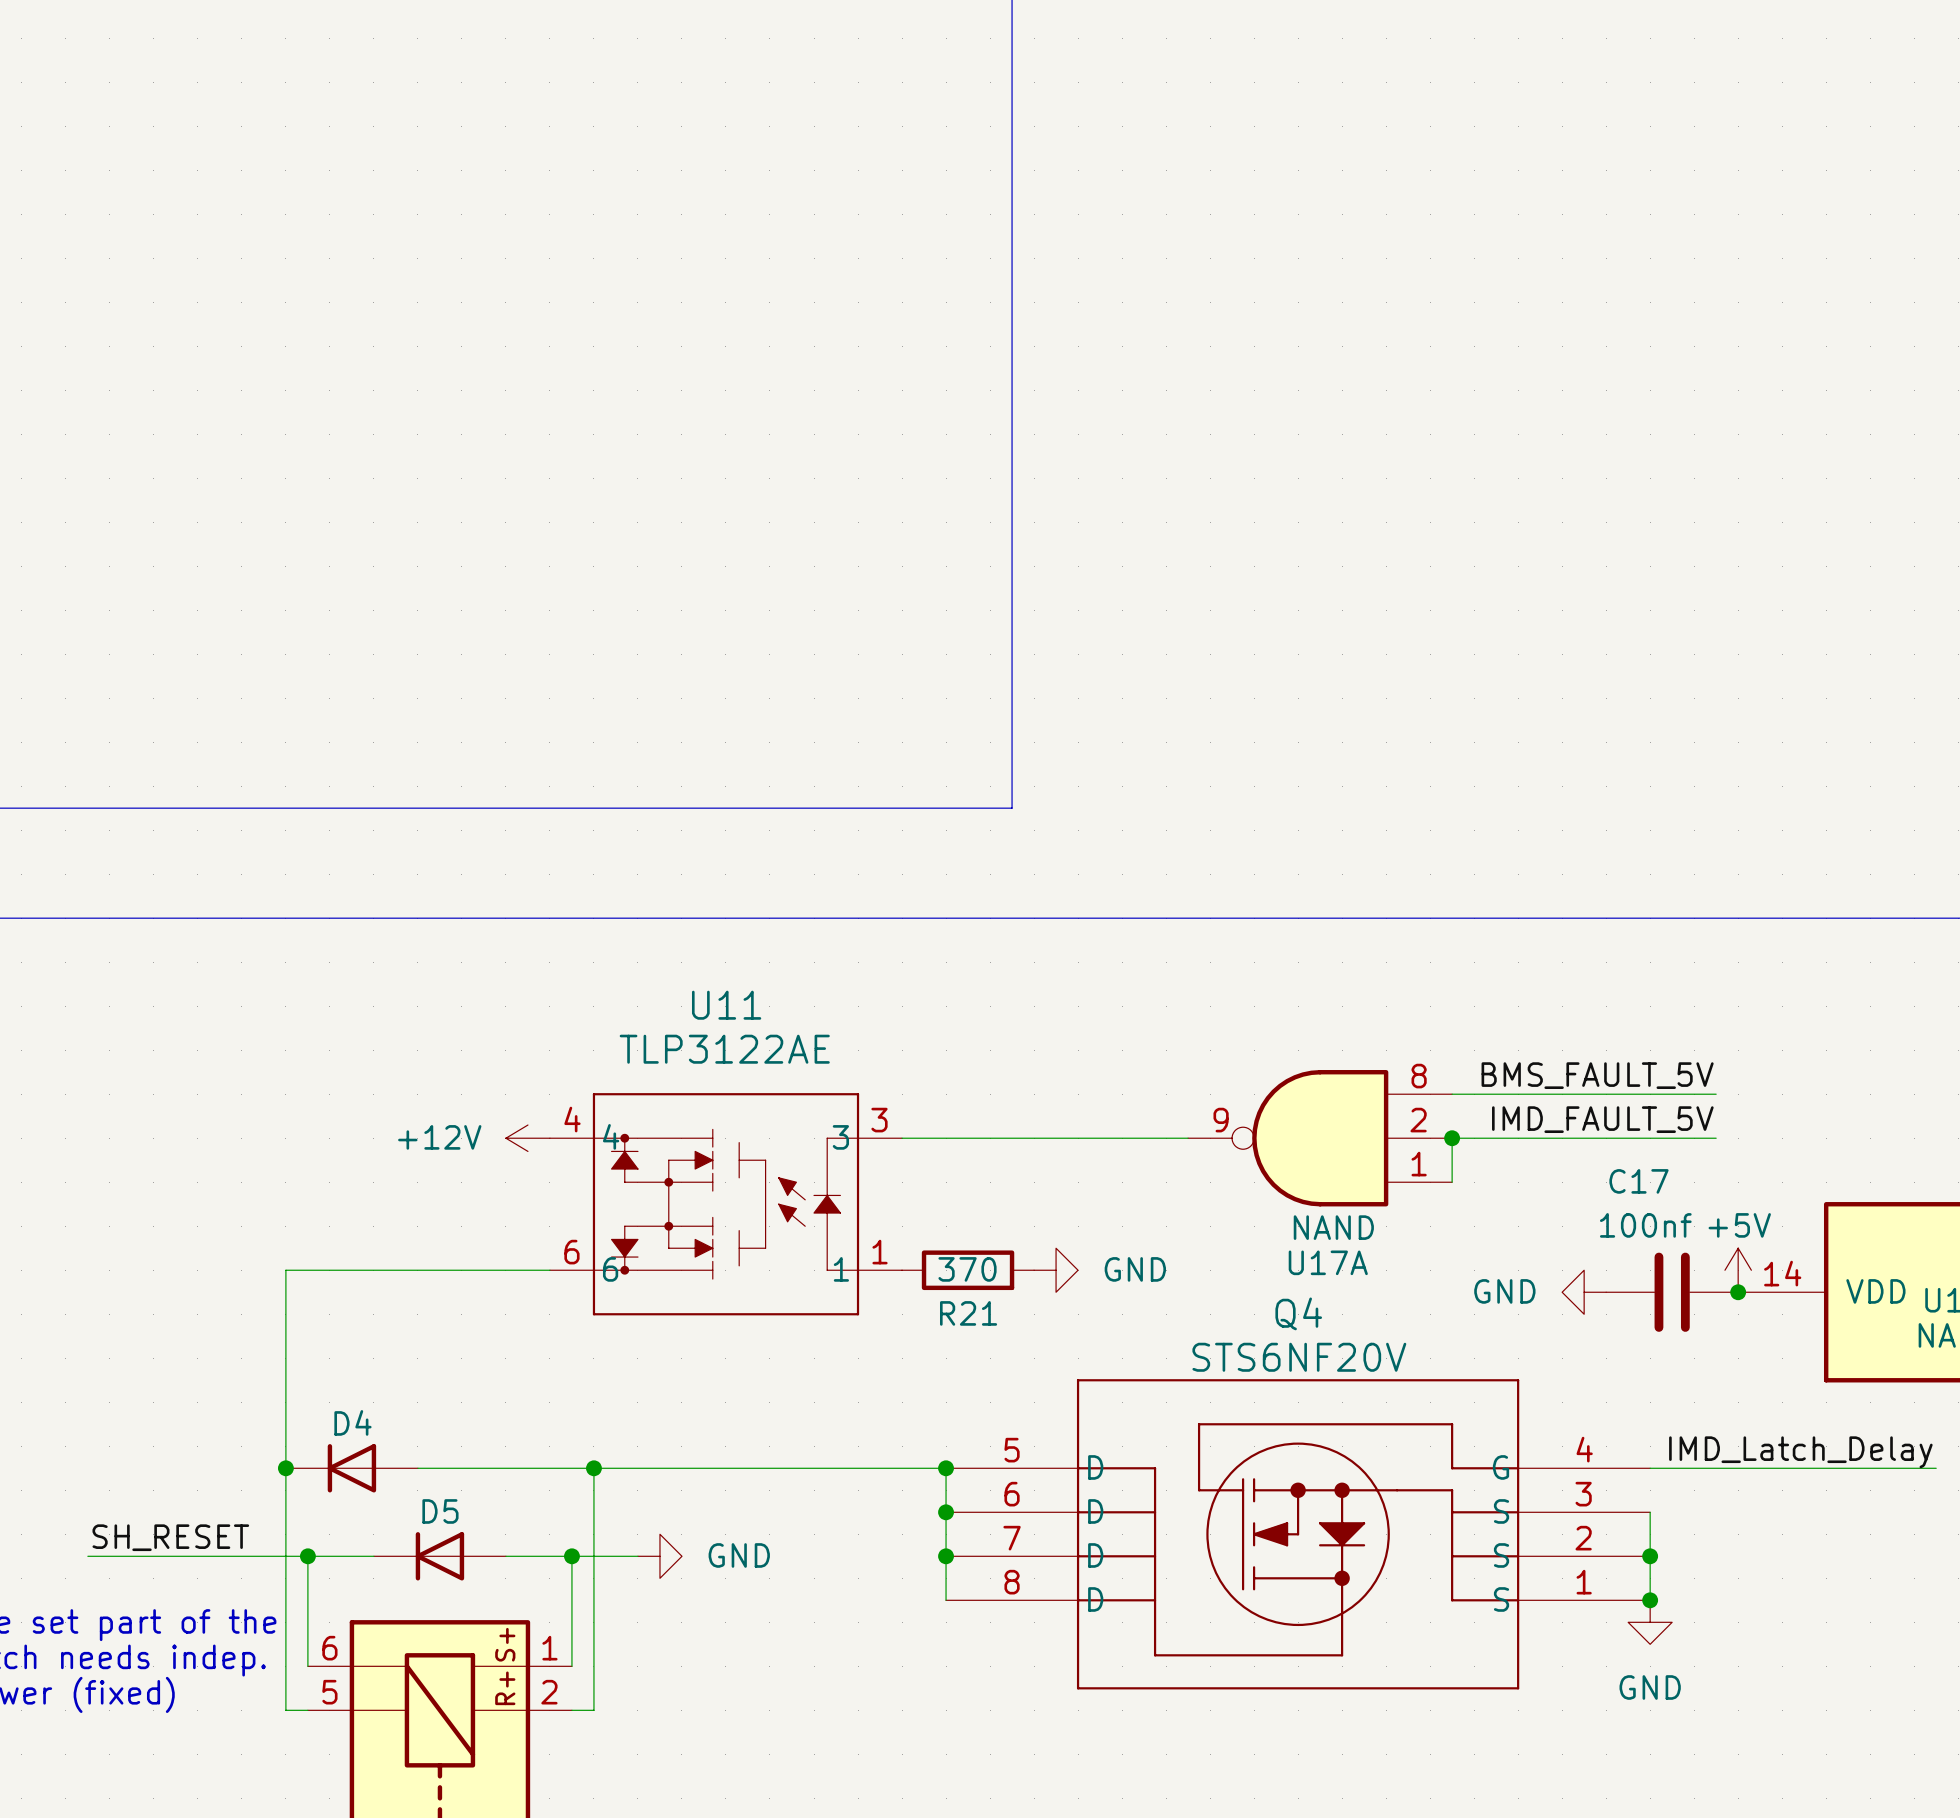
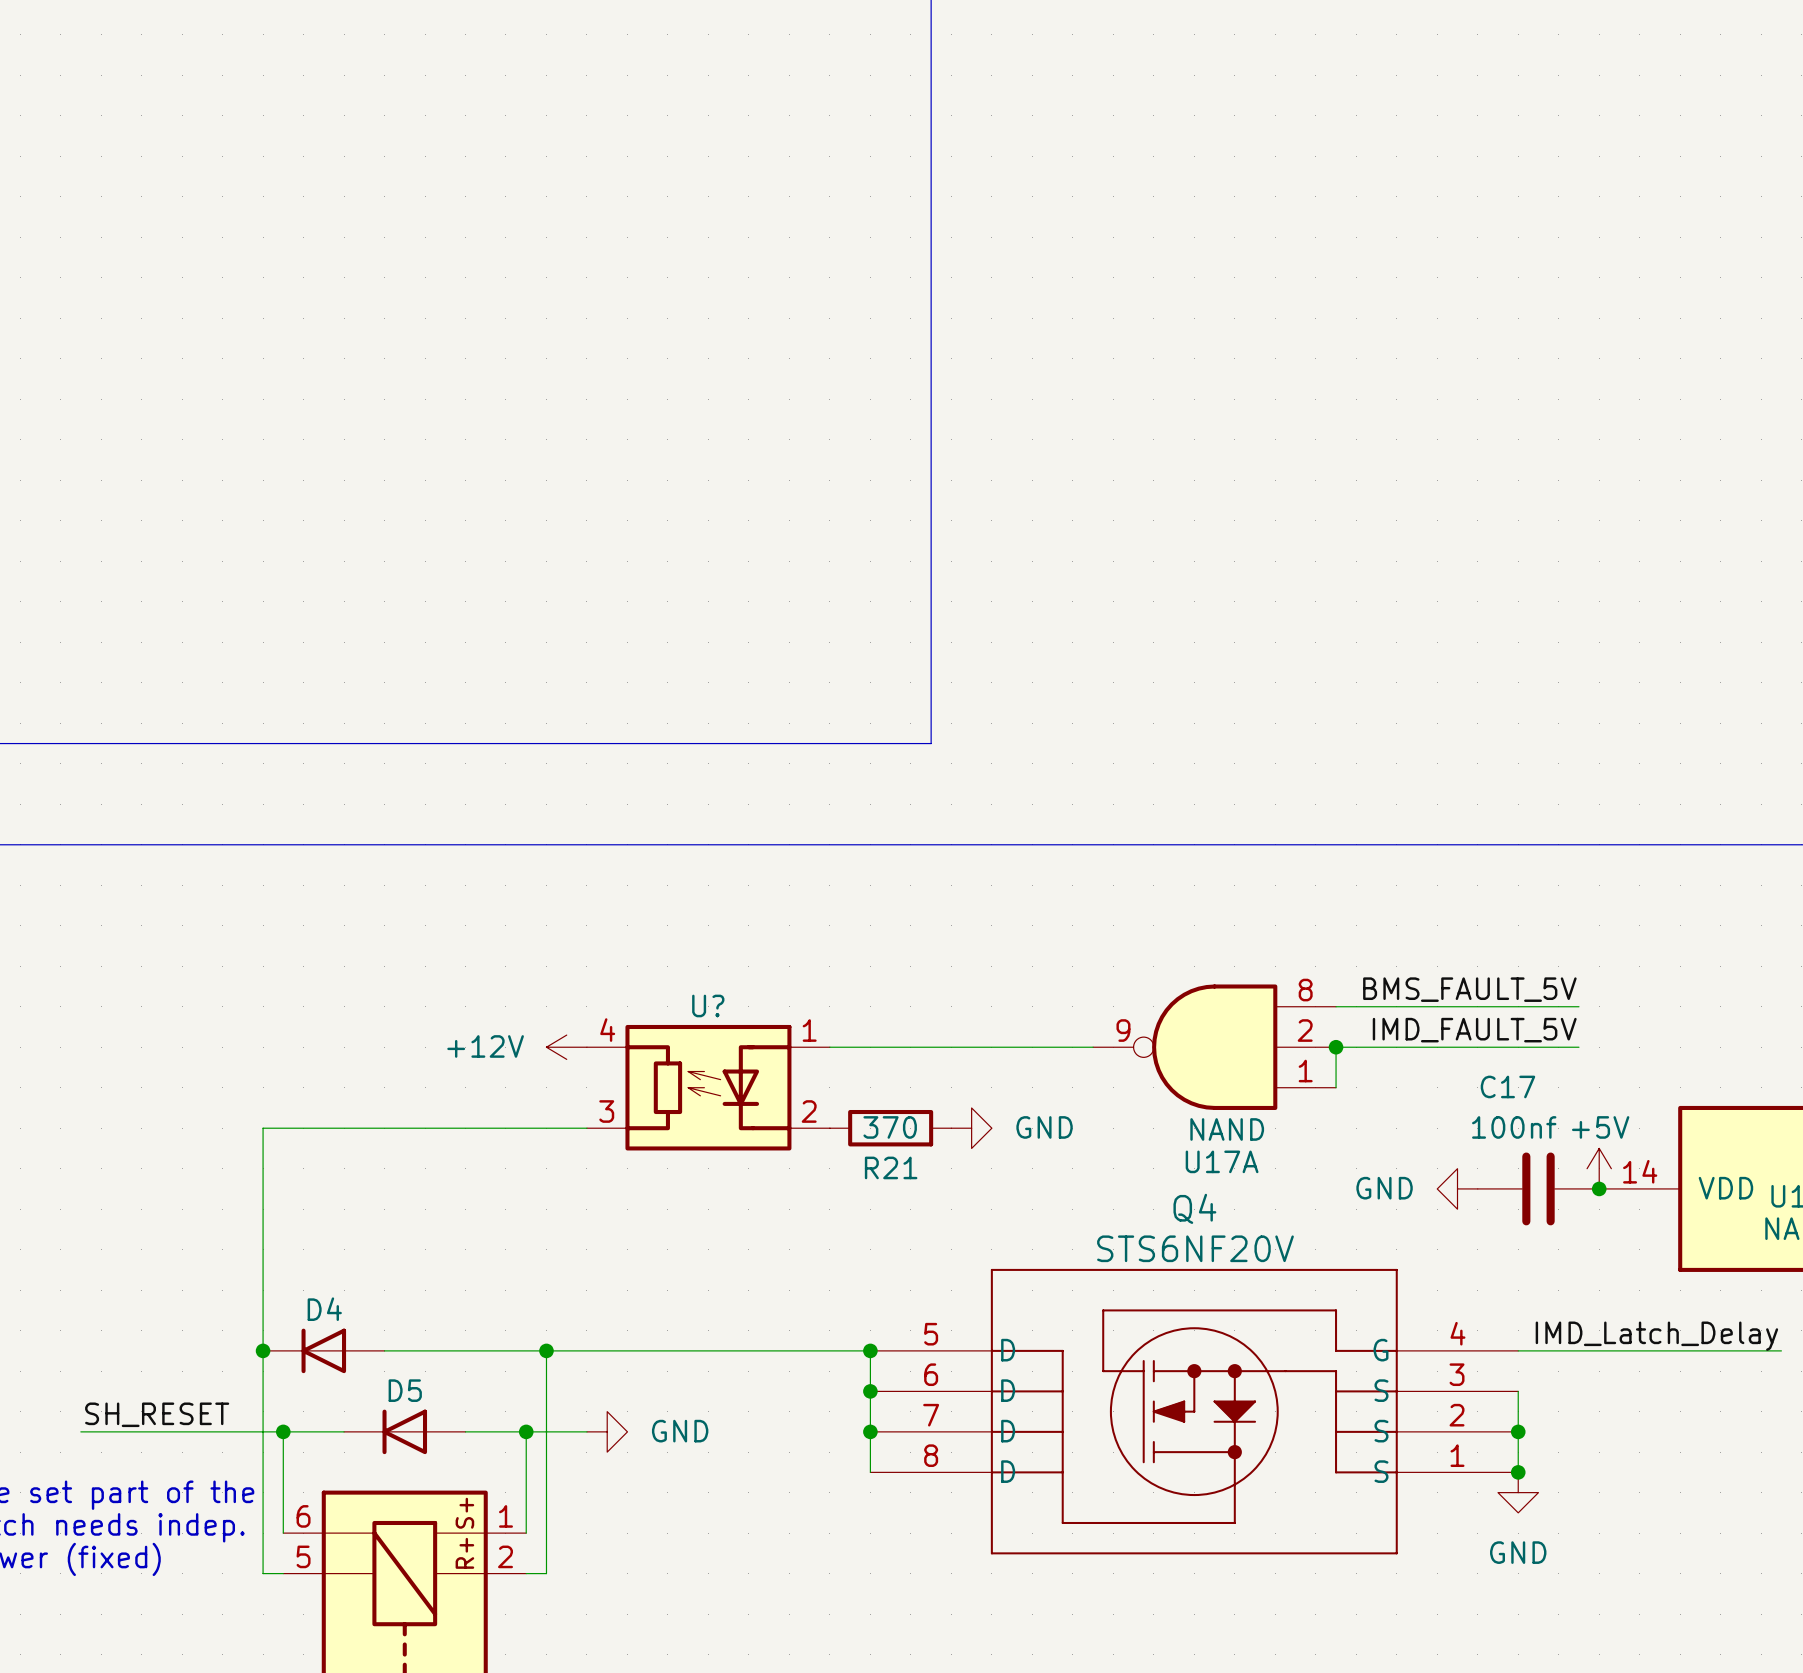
power symbol position: +12V (527, 1138) -> +12V (566, 1047)
U?: none -> (708, 1087)
U11: TLP3122AE (725, 1204) -> none
wire: (285, 1270) (549, 1270) -> (263, 1168) (263, 1128) (586, 1128)
R21 position: (968, 1270) -> (890, 1128)
power symbol position: GND (1056, 1270) -> GND (971, 1128)

